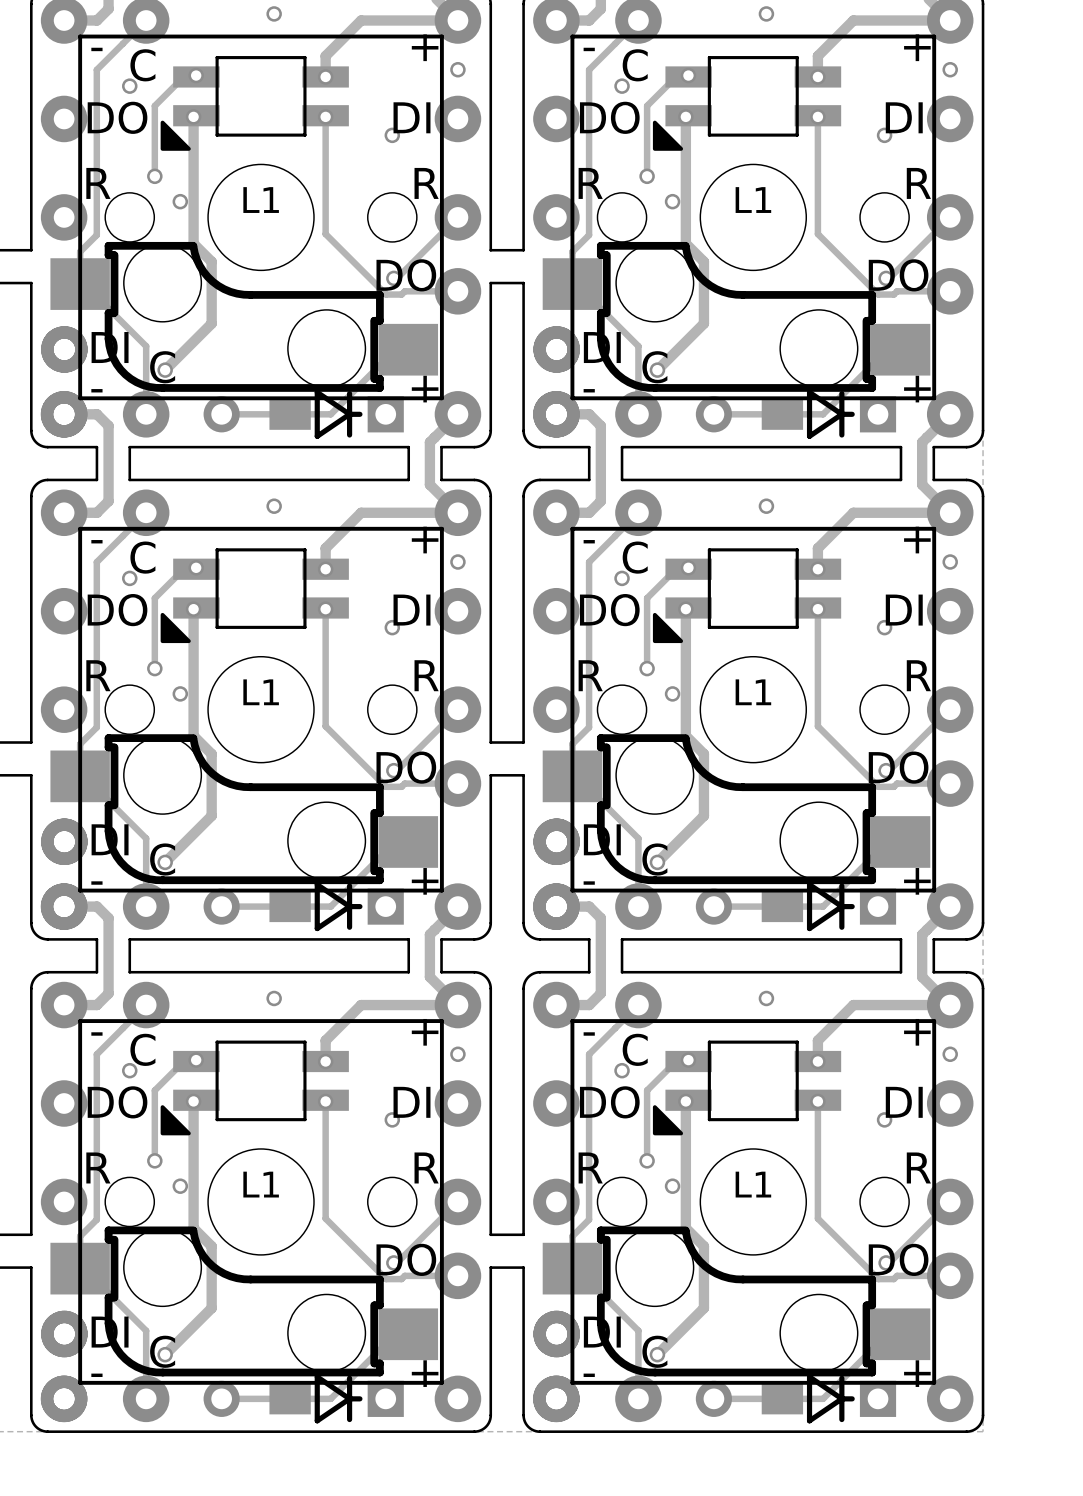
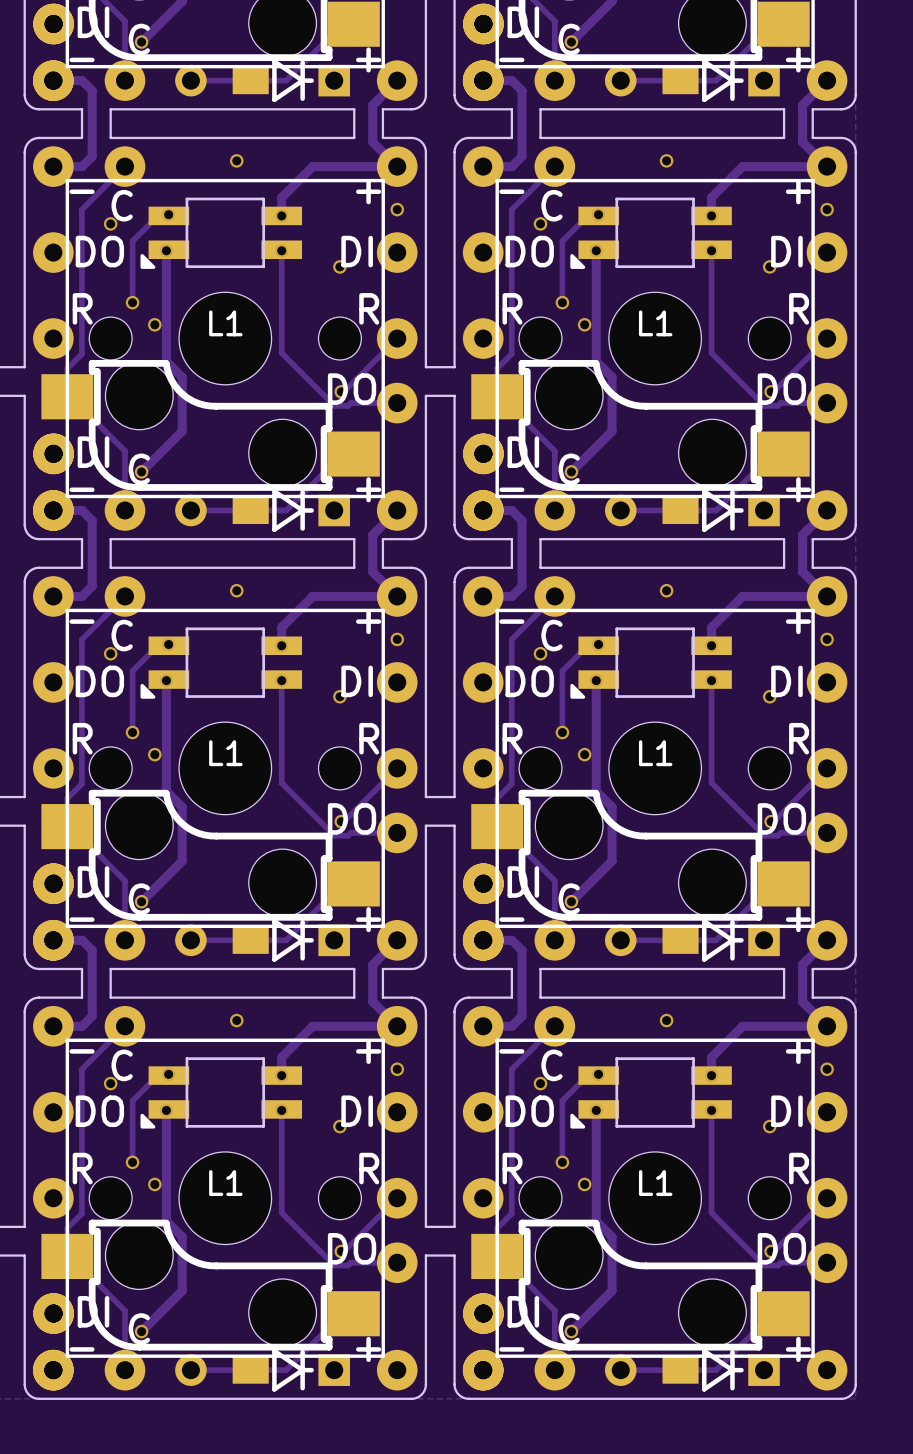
L1 footprint: [160, 56, 349, 151] -> [140, 197, 303, 269]
L1 footprint: [652, 56, 842, 151] -> [570, 197, 732, 269]
L1 footprint: [160, 548, 349, 644] -> [140, 627, 303, 699]
L1 footprint: [652, 548, 842, 644] -> [570, 627, 732, 699]
L1 footprint: [160, 1040, 349, 1136] -> [140, 1057, 303, 1129]
L1 footprint: [652, 1040, 842, 1136] -> [570, 1057, 732, 1129]

